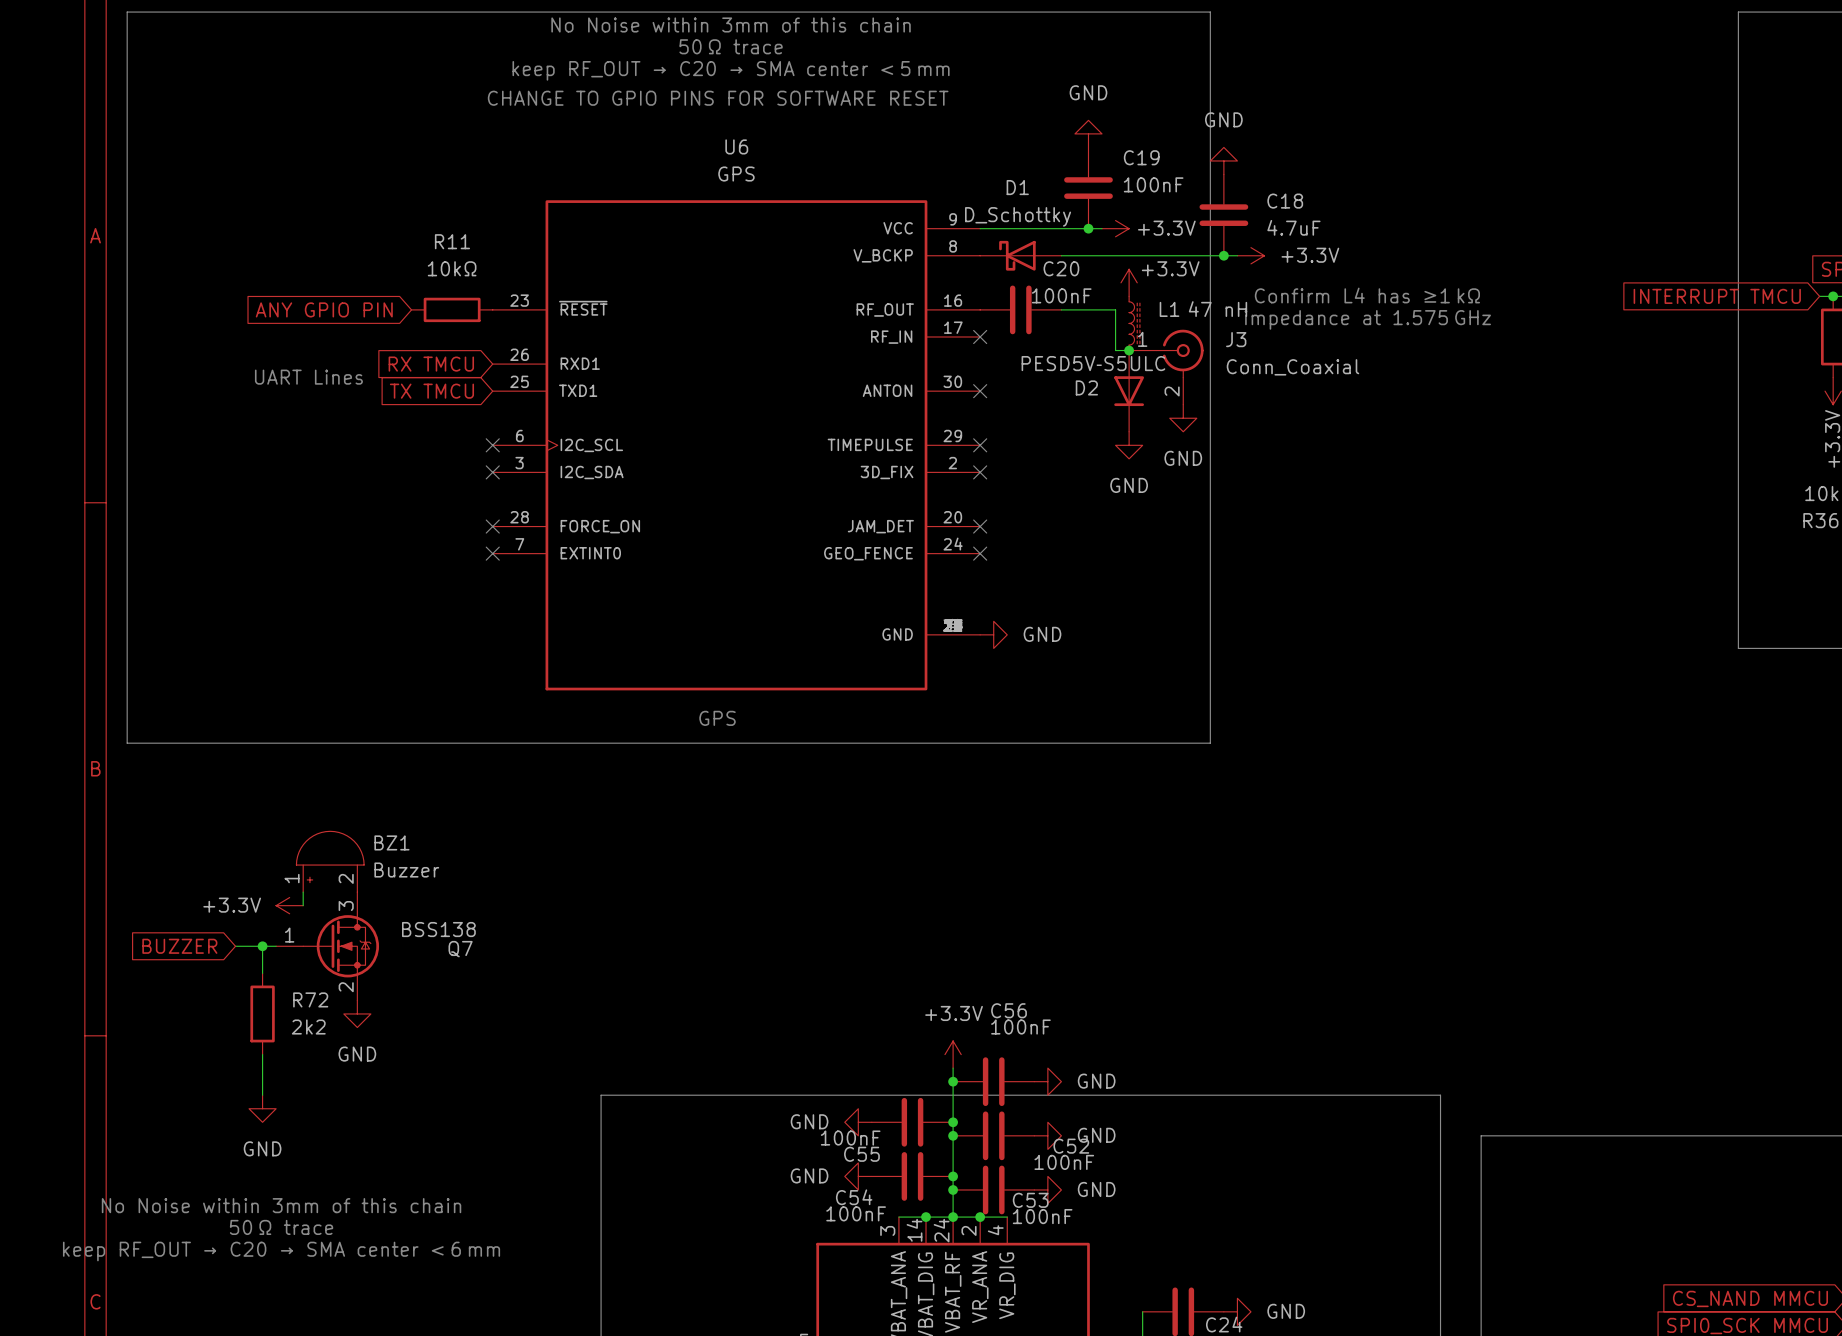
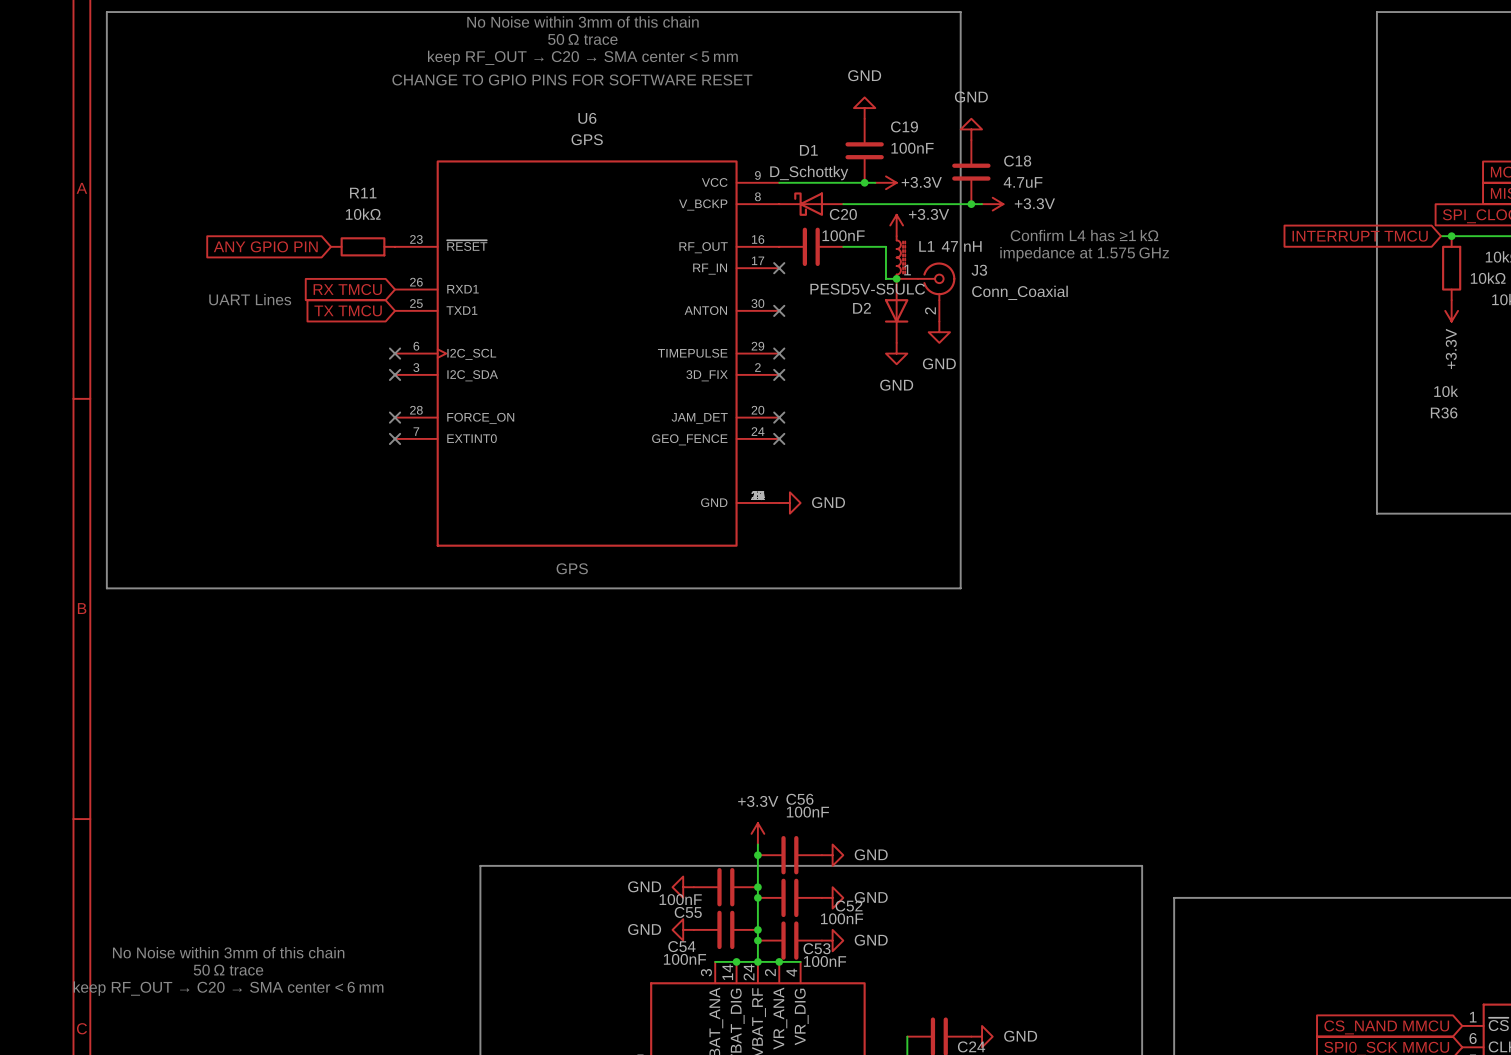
BZ1: Buzzer (330, 861) -> none
wire: (303, 892) (303, 905) -> none
power symbol: +3.3V (289, 905) -> none
global label: BUZZER (179, 946) -> none
wire: (235, 946) (276, 946) -> none
wire: (262, 946) (262, 973) -> none
junction: (262, 946) -> none
Q7: BSS138 (327, 946) -> none
R72: 2k2 (262, 1013) -> none
power symbol: GND (357, 1013) -> none
wire: (262, 1054) (262, 1095) -> none
power symbol: GND (262, 1108) -> none

